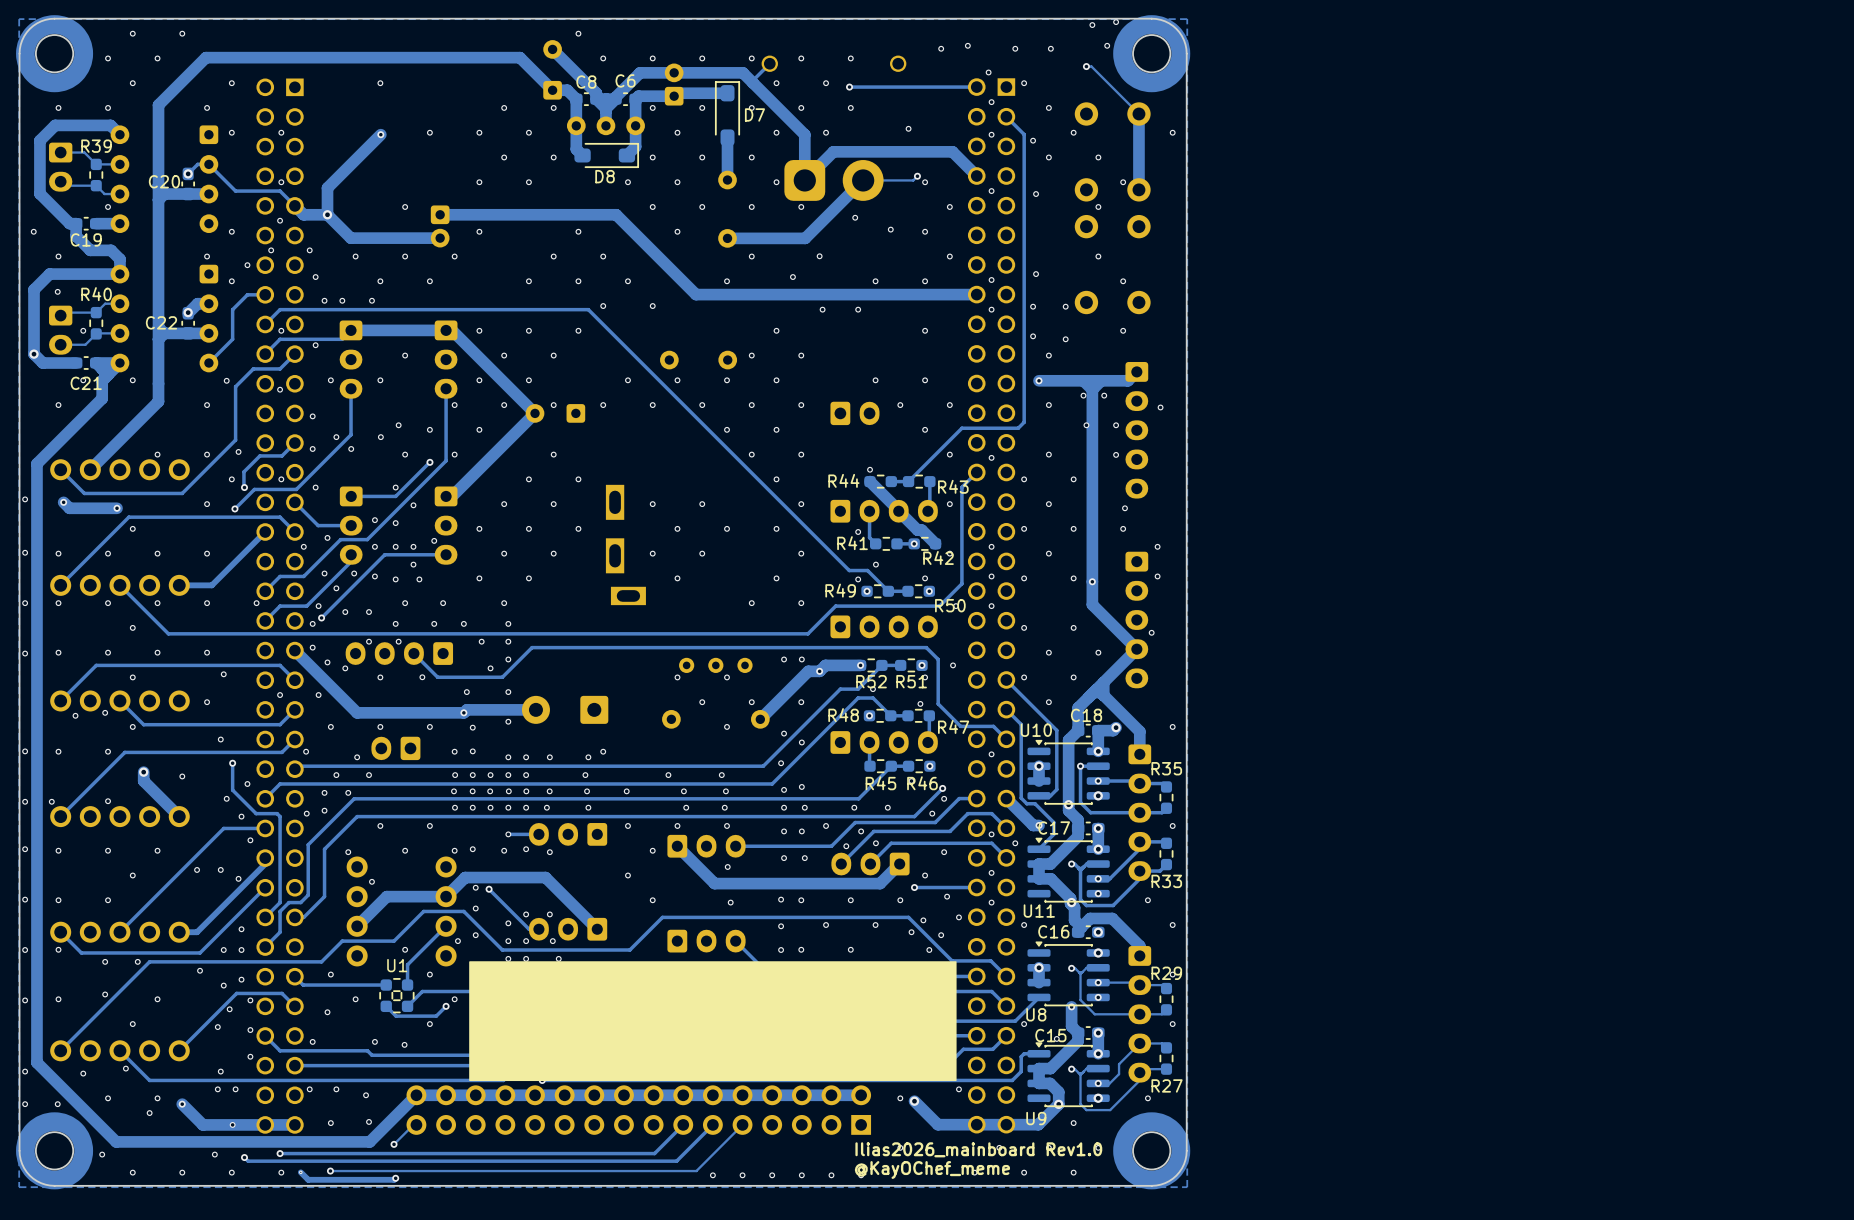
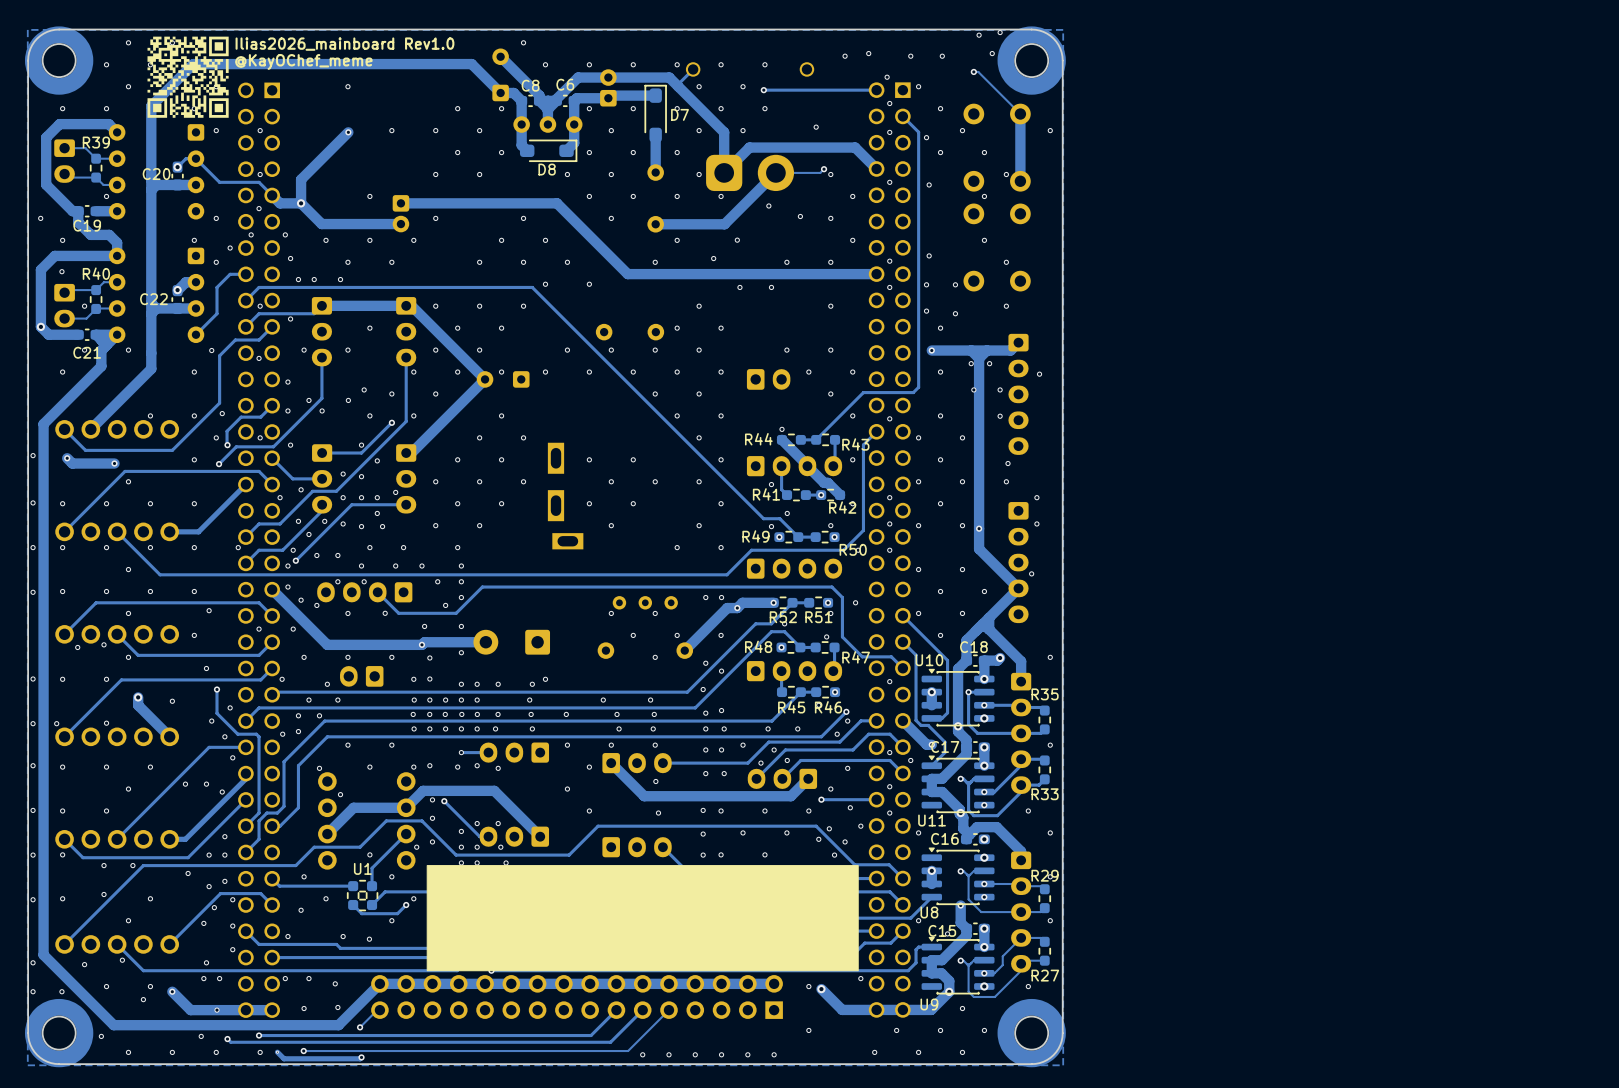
drawing: none -> [147, 36, 229, 118]
text: none -> Ilias2026_mainboard Rev1.0 (344, 44)
text: none -> @KayOChef_meme (303, 61)
text: Ilias2026_mainboard Rev1.0 (978, 1149) -> none
text: @KayOChef_meme (932, 1170) -> none

